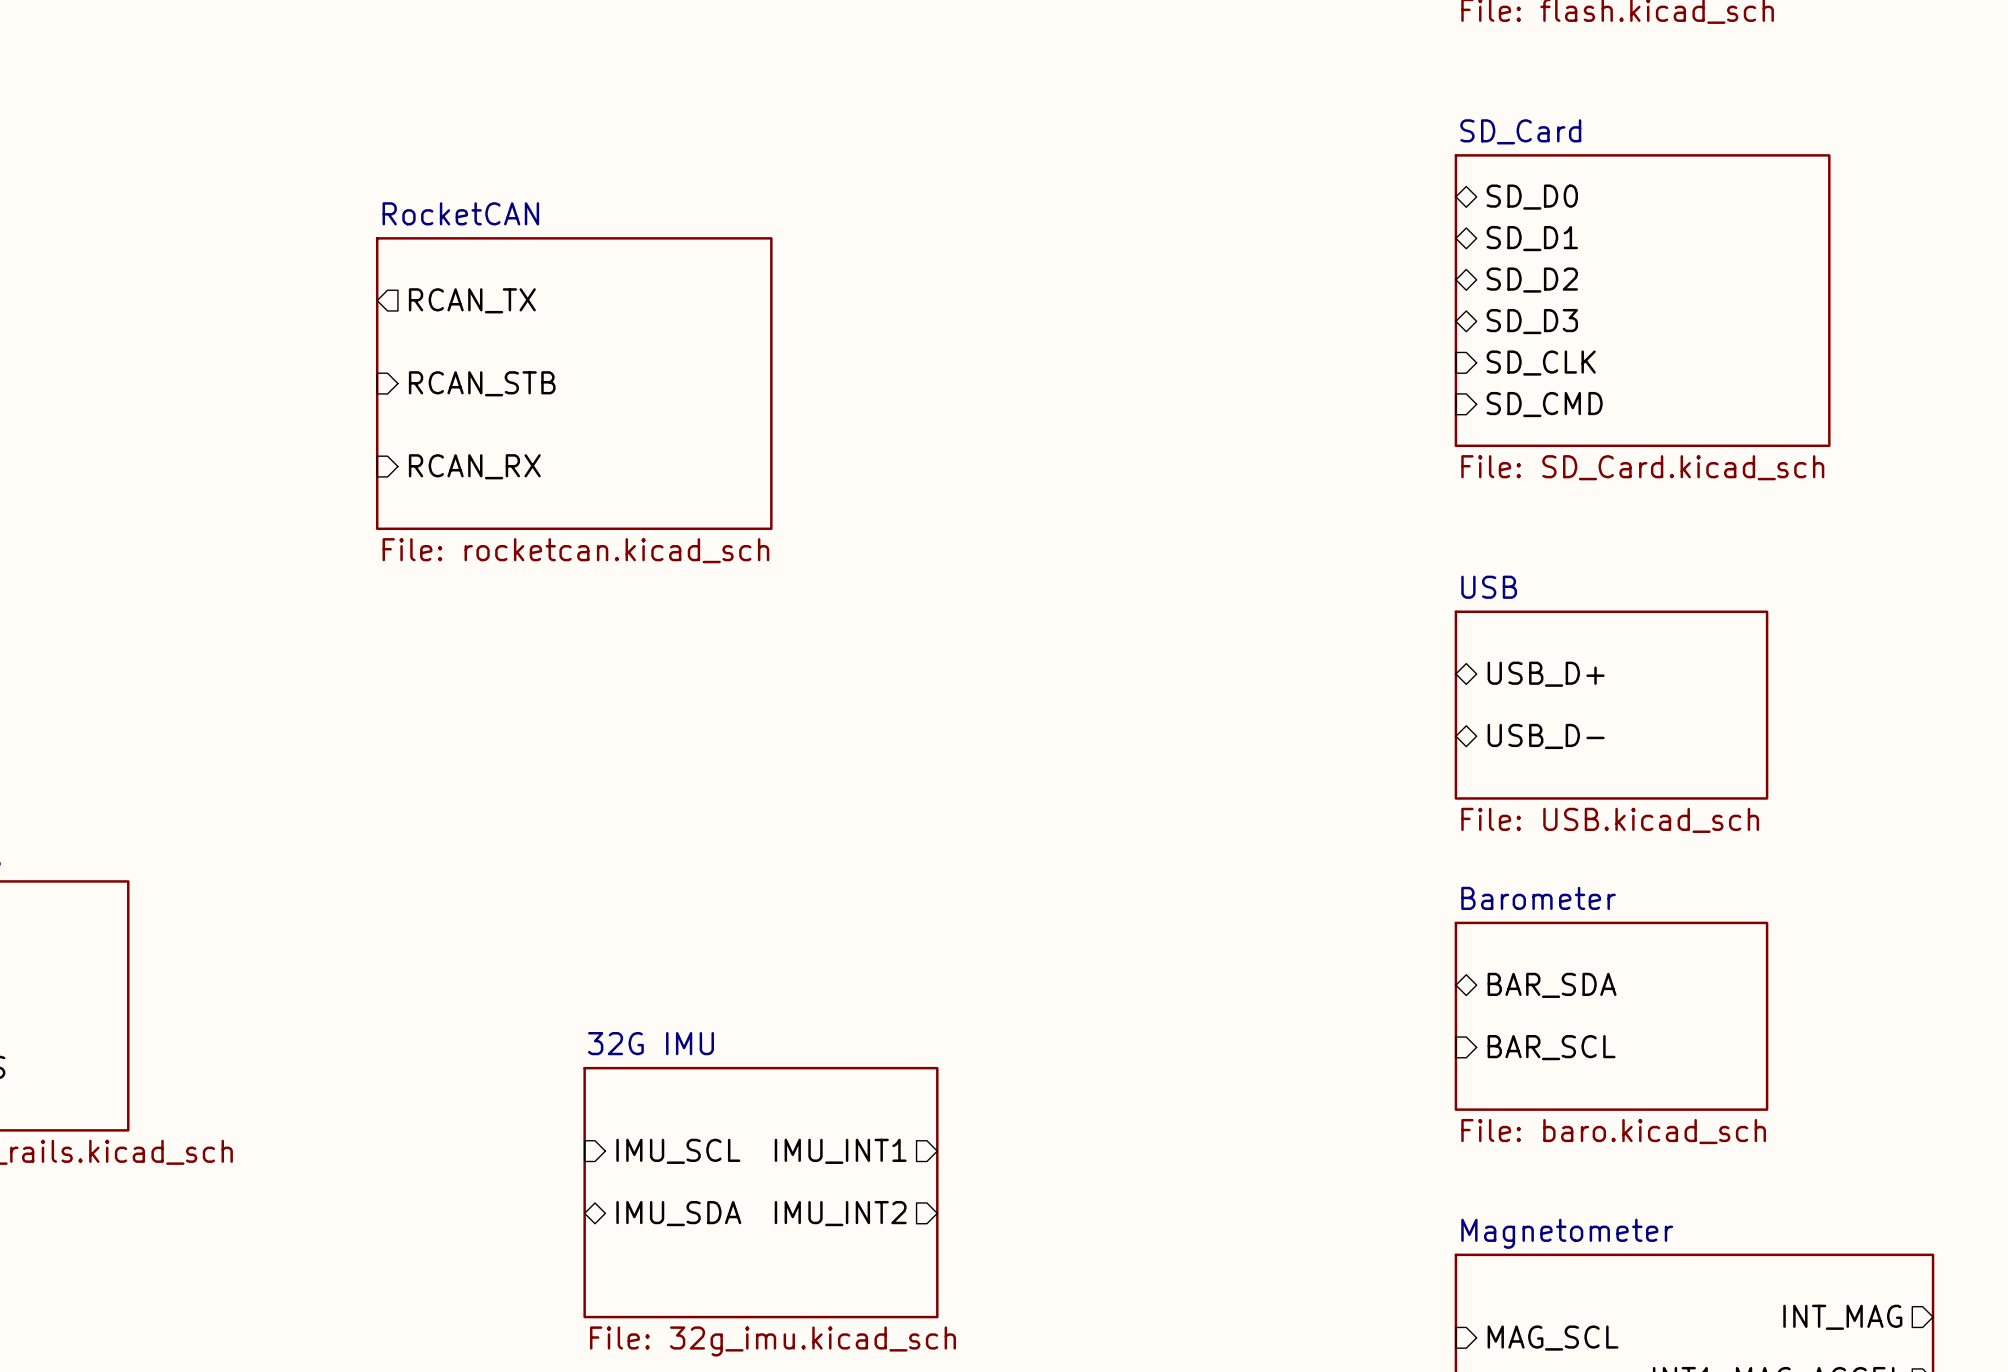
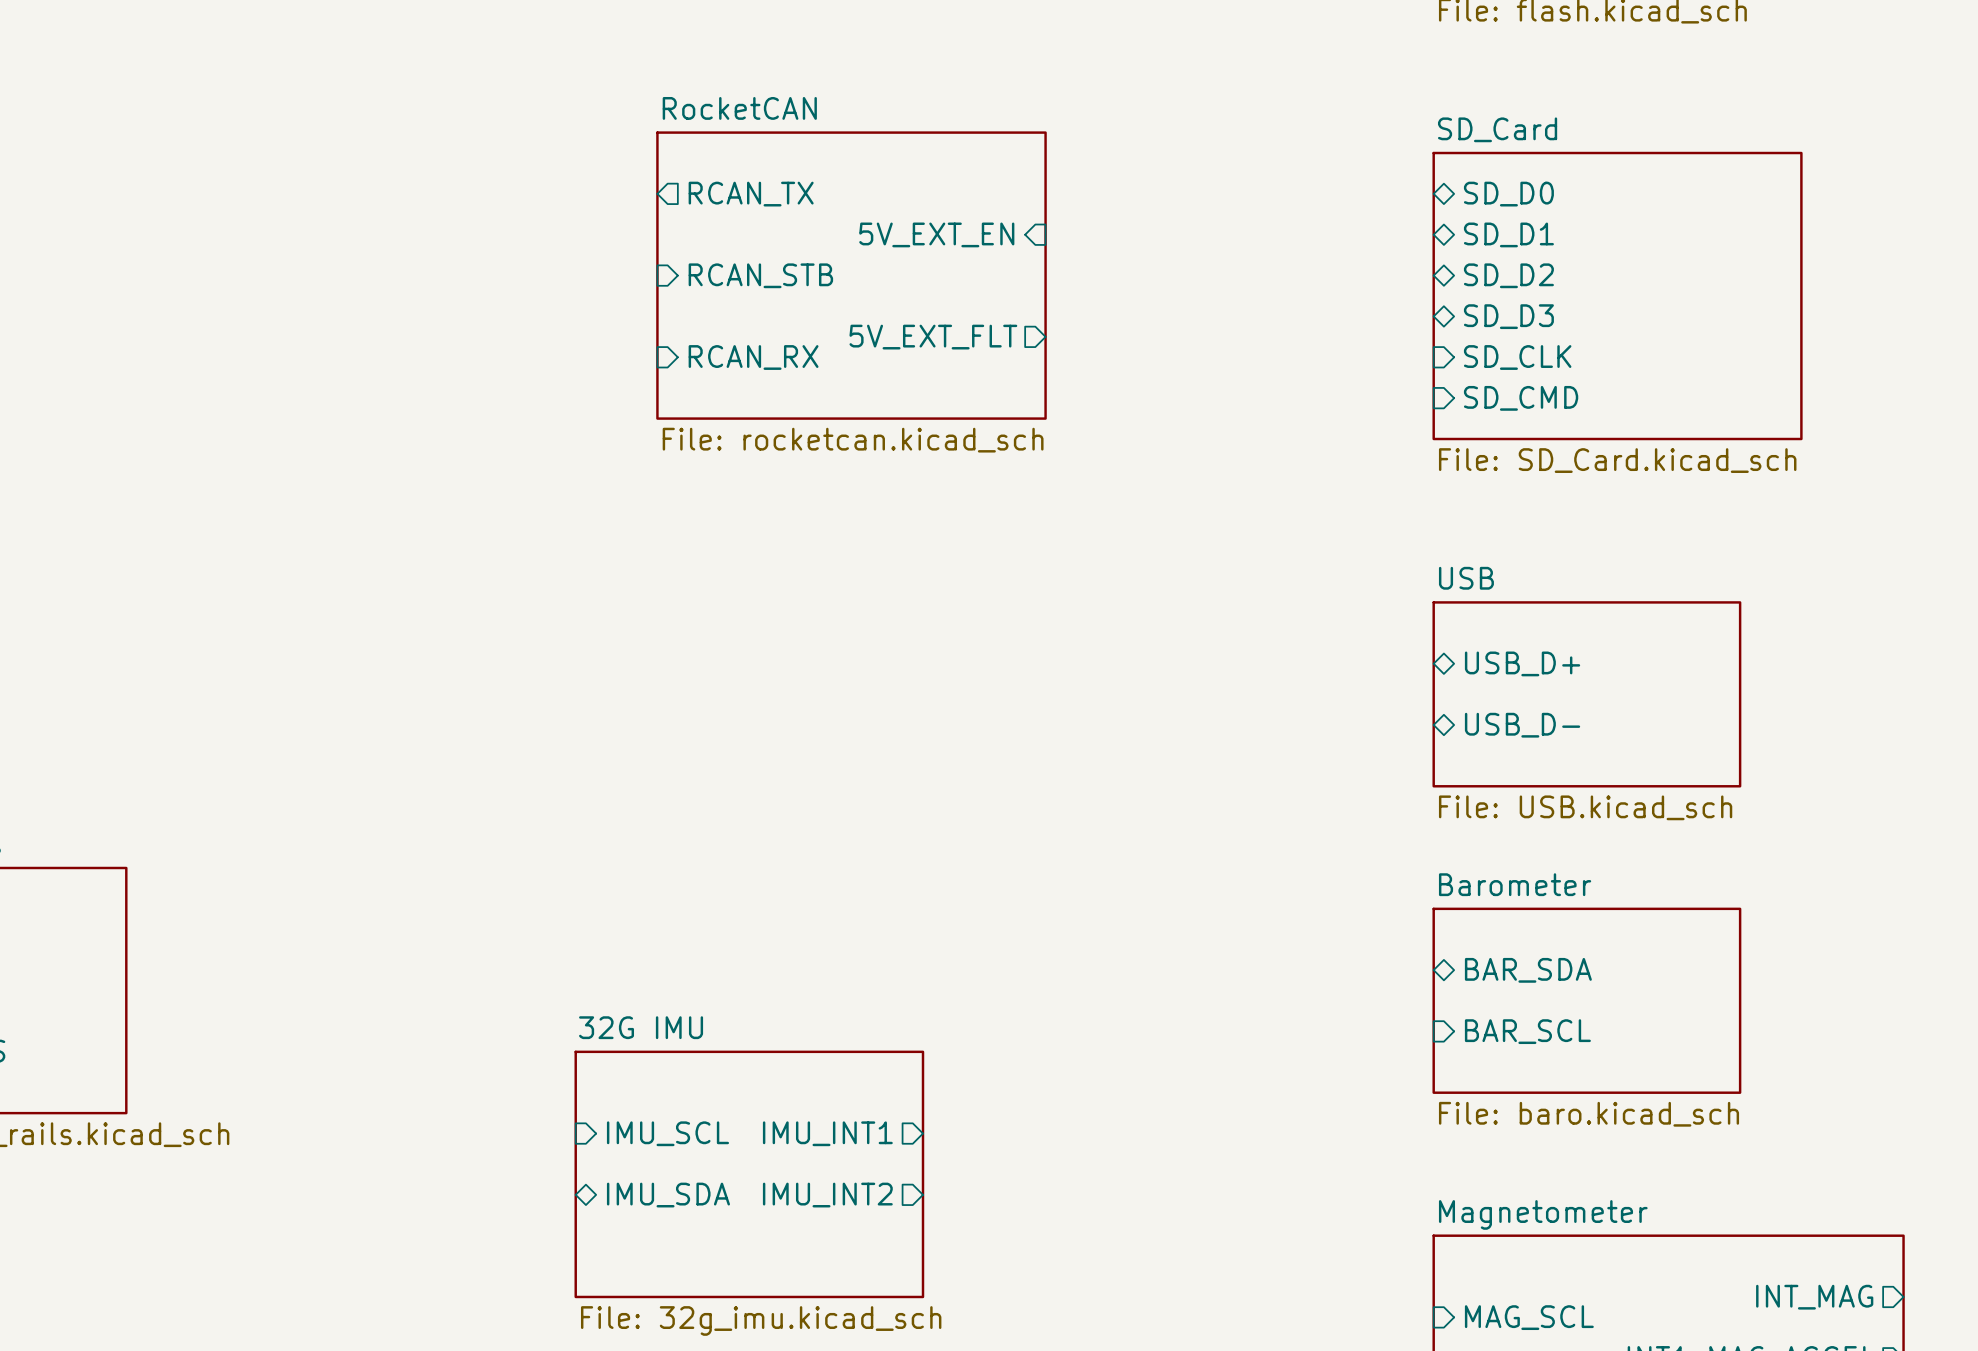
sheet pin: none -> 5V_EXT_EN (936, 234)
sheet pin position: RCAN_TX (472, 300) -> RCAN_TX (751, 194)
sheet pin: none -> 5V_EXT_FLT (933, 337)
sheet pin position: RCAN_STB (482, 383) -> RCAN_STB (760, 275)
sheet RocketCAN position: (574, 383) -> (851, 275)
sheet pin position: RCAN_RX (474, 466) -> RCAN_RX (753, 357)

